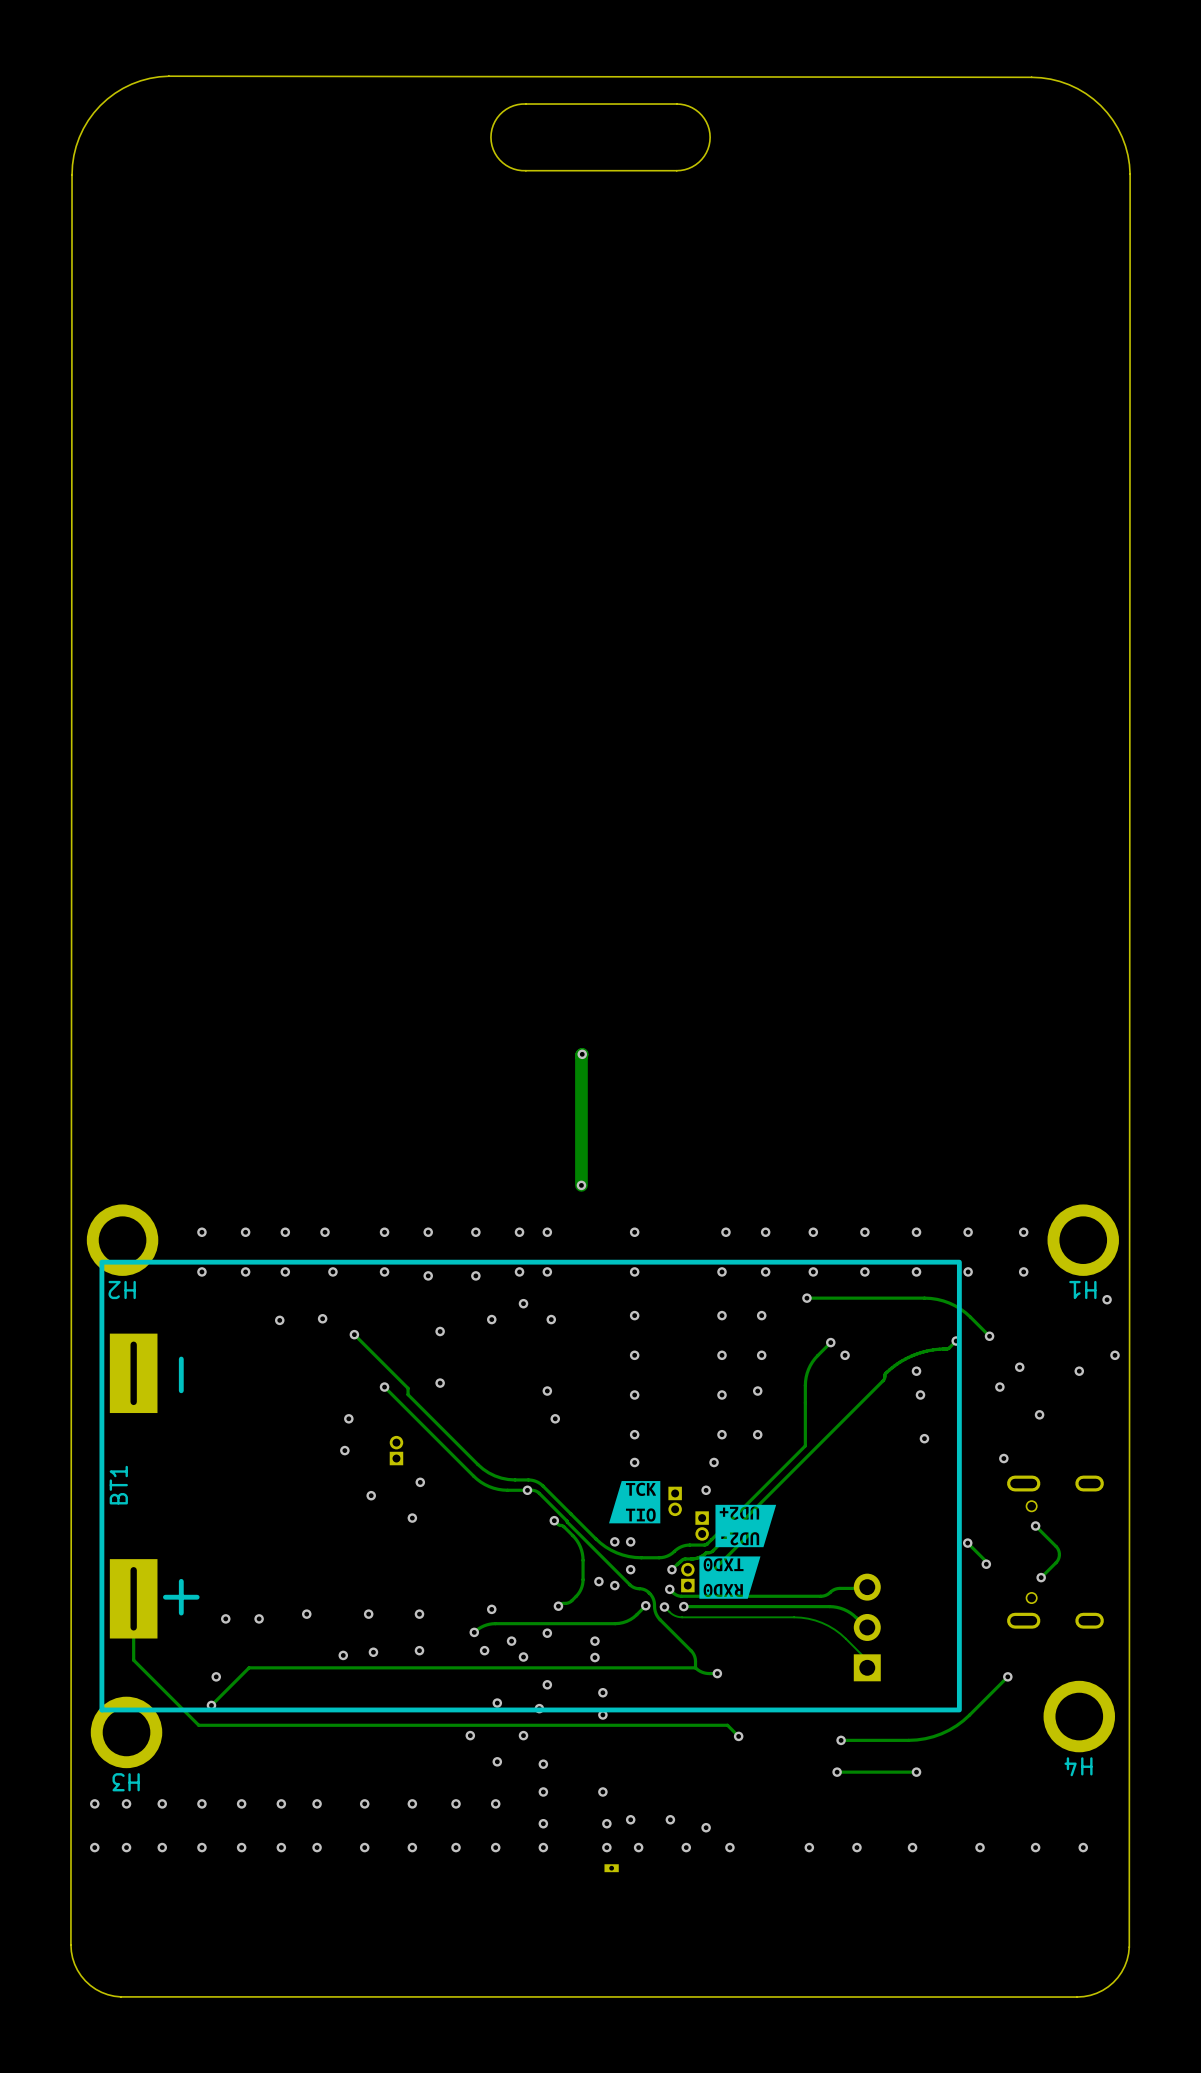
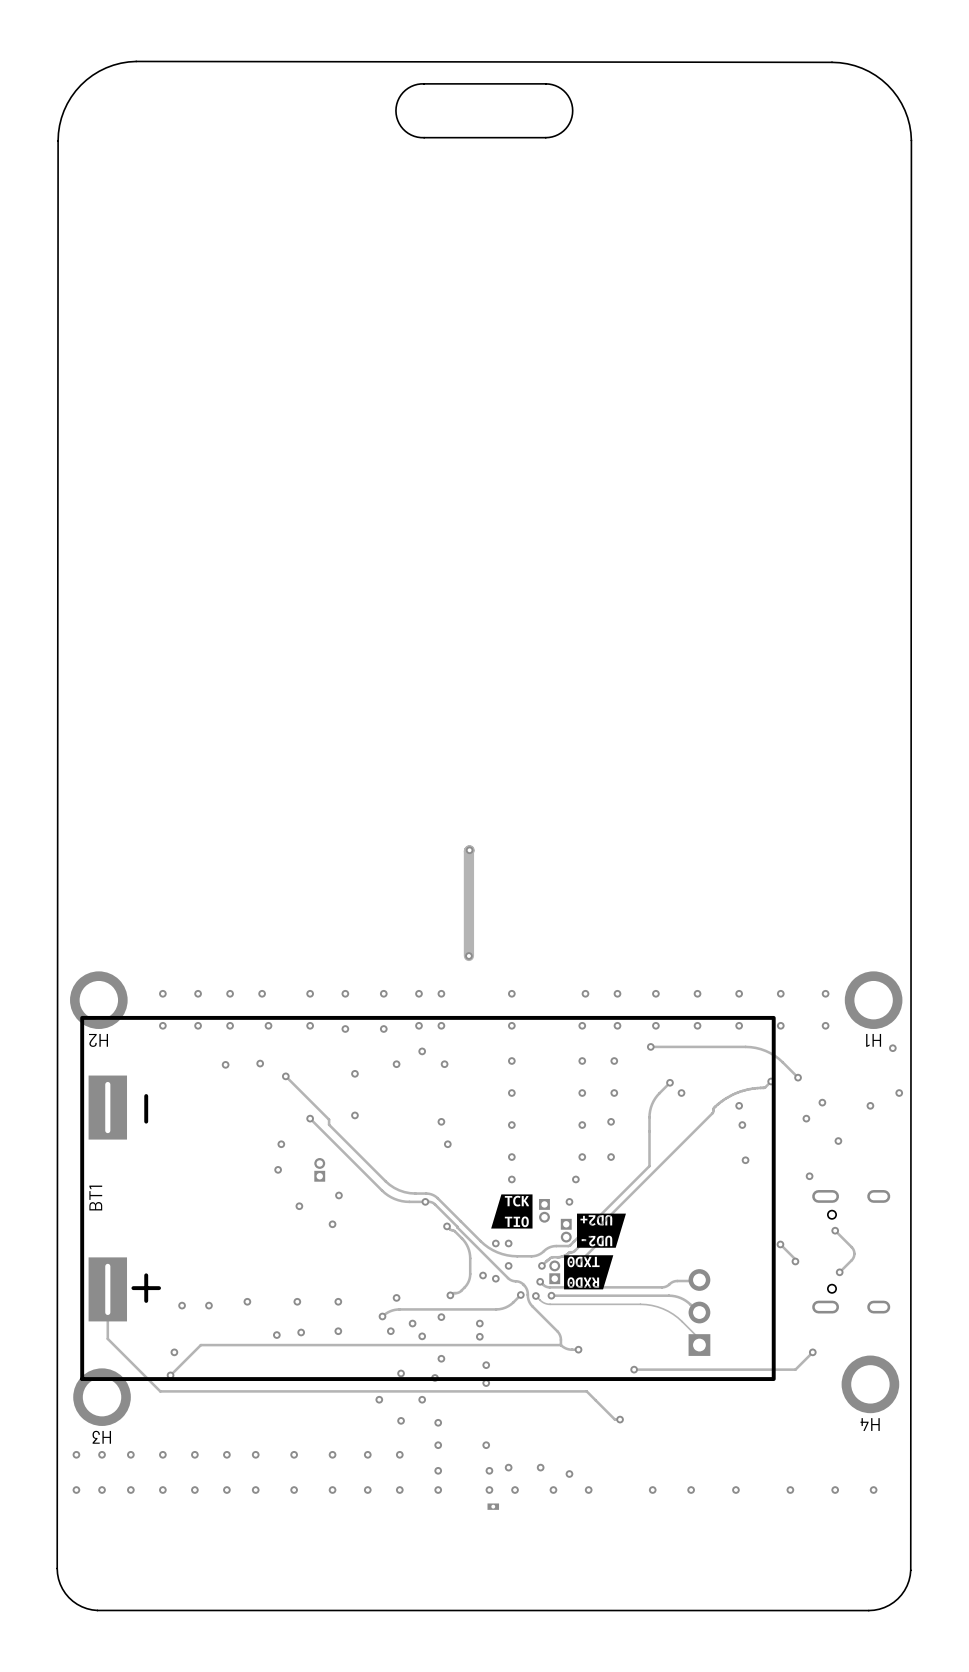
via: none -> (634, 1369)
track: (986, 1698) (956, 1725) (933, 1736) (908, 1740) (841, 1740) -> (795, 1369) (634, 1369)
track: none -> (595, 1400) (614, 1419) (620, 1419)
via: (738, 1736) -> none
via: (841, 1740) -> none
via: none -> (620, 1419)
via: (837, 1772) -> none
track: (916, 1772) (837, 1772) -> none
via: (916, 1772) -> none

